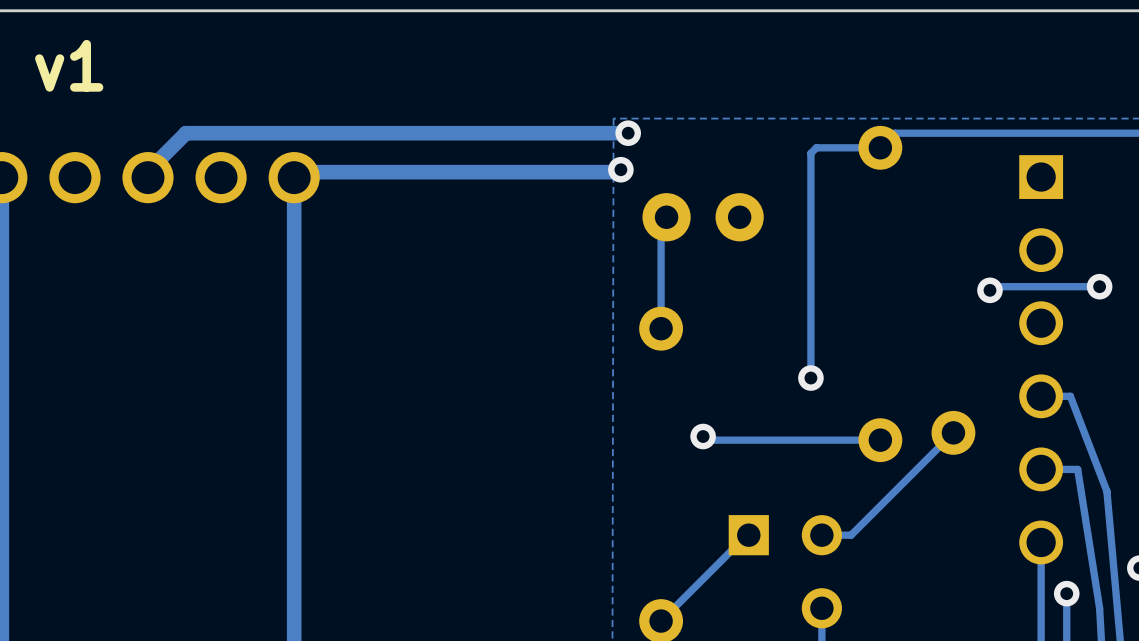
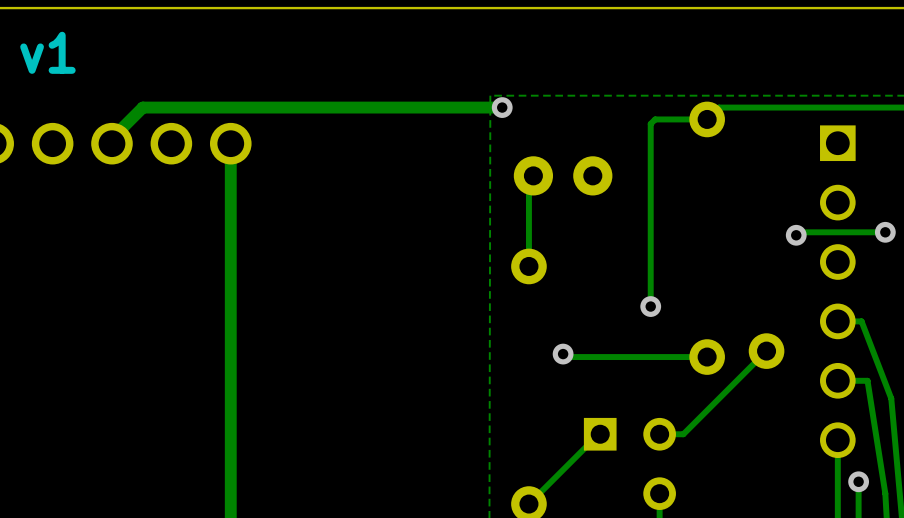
track: (620, 169) (618, 172) (294, 172) (294, 177) -> none
via: (620, 169) -> none

